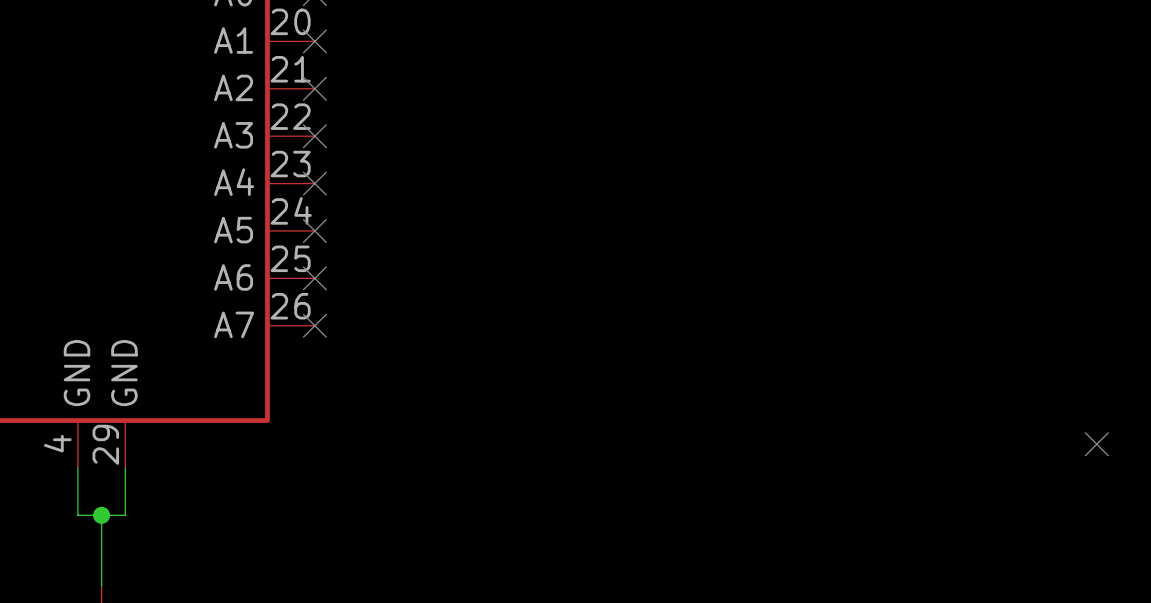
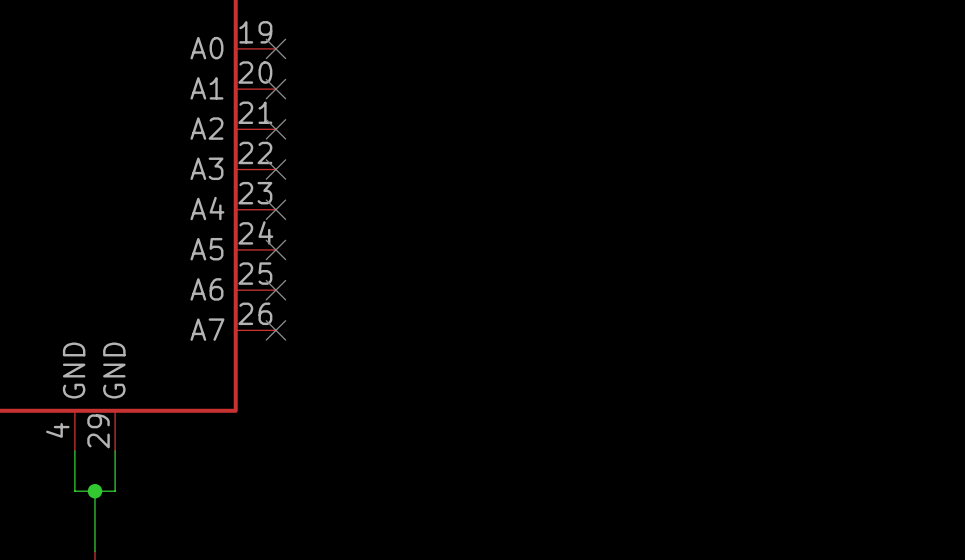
no-connect mark: (1096, 444) -> none

